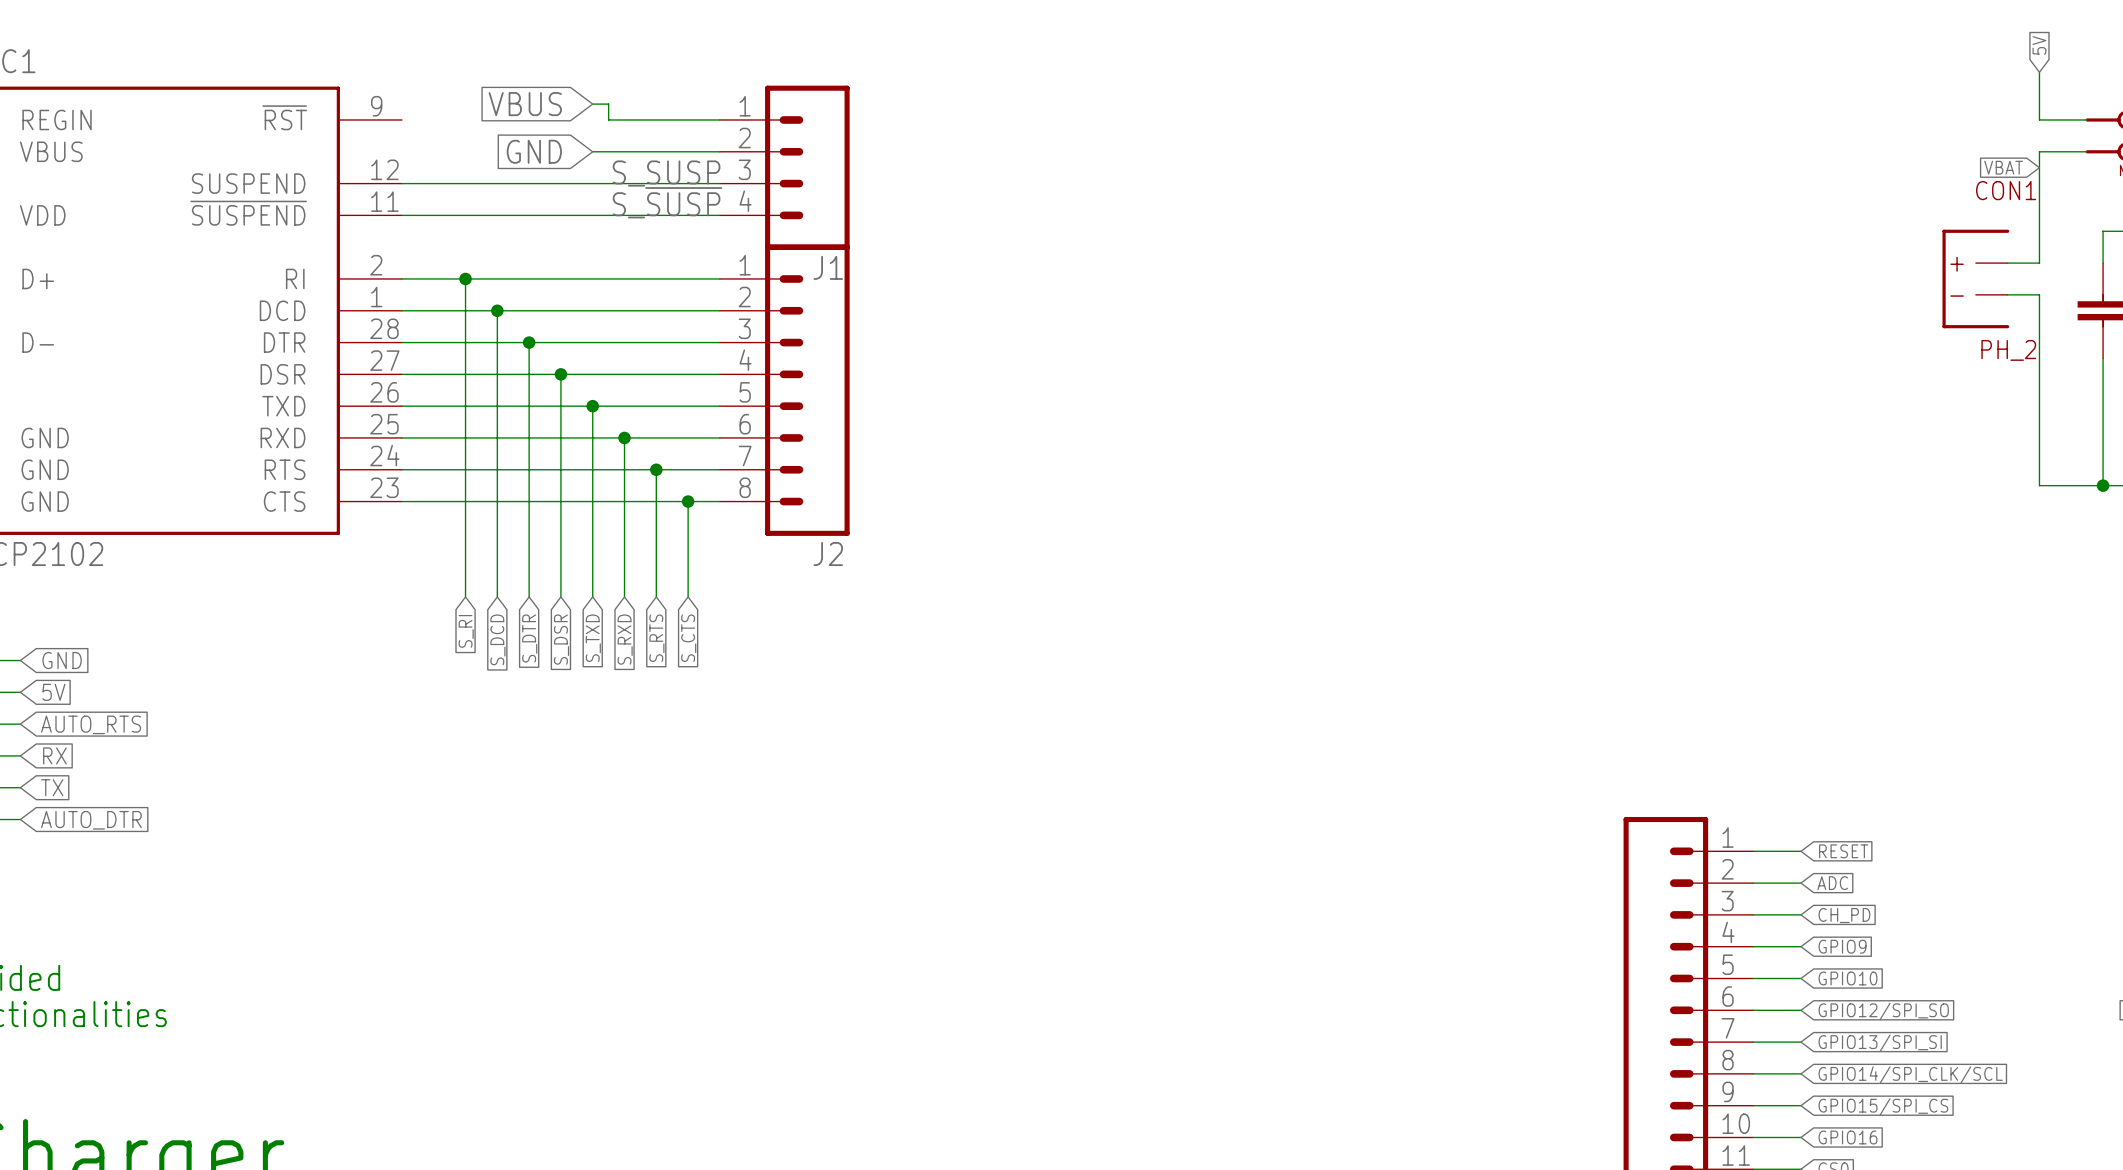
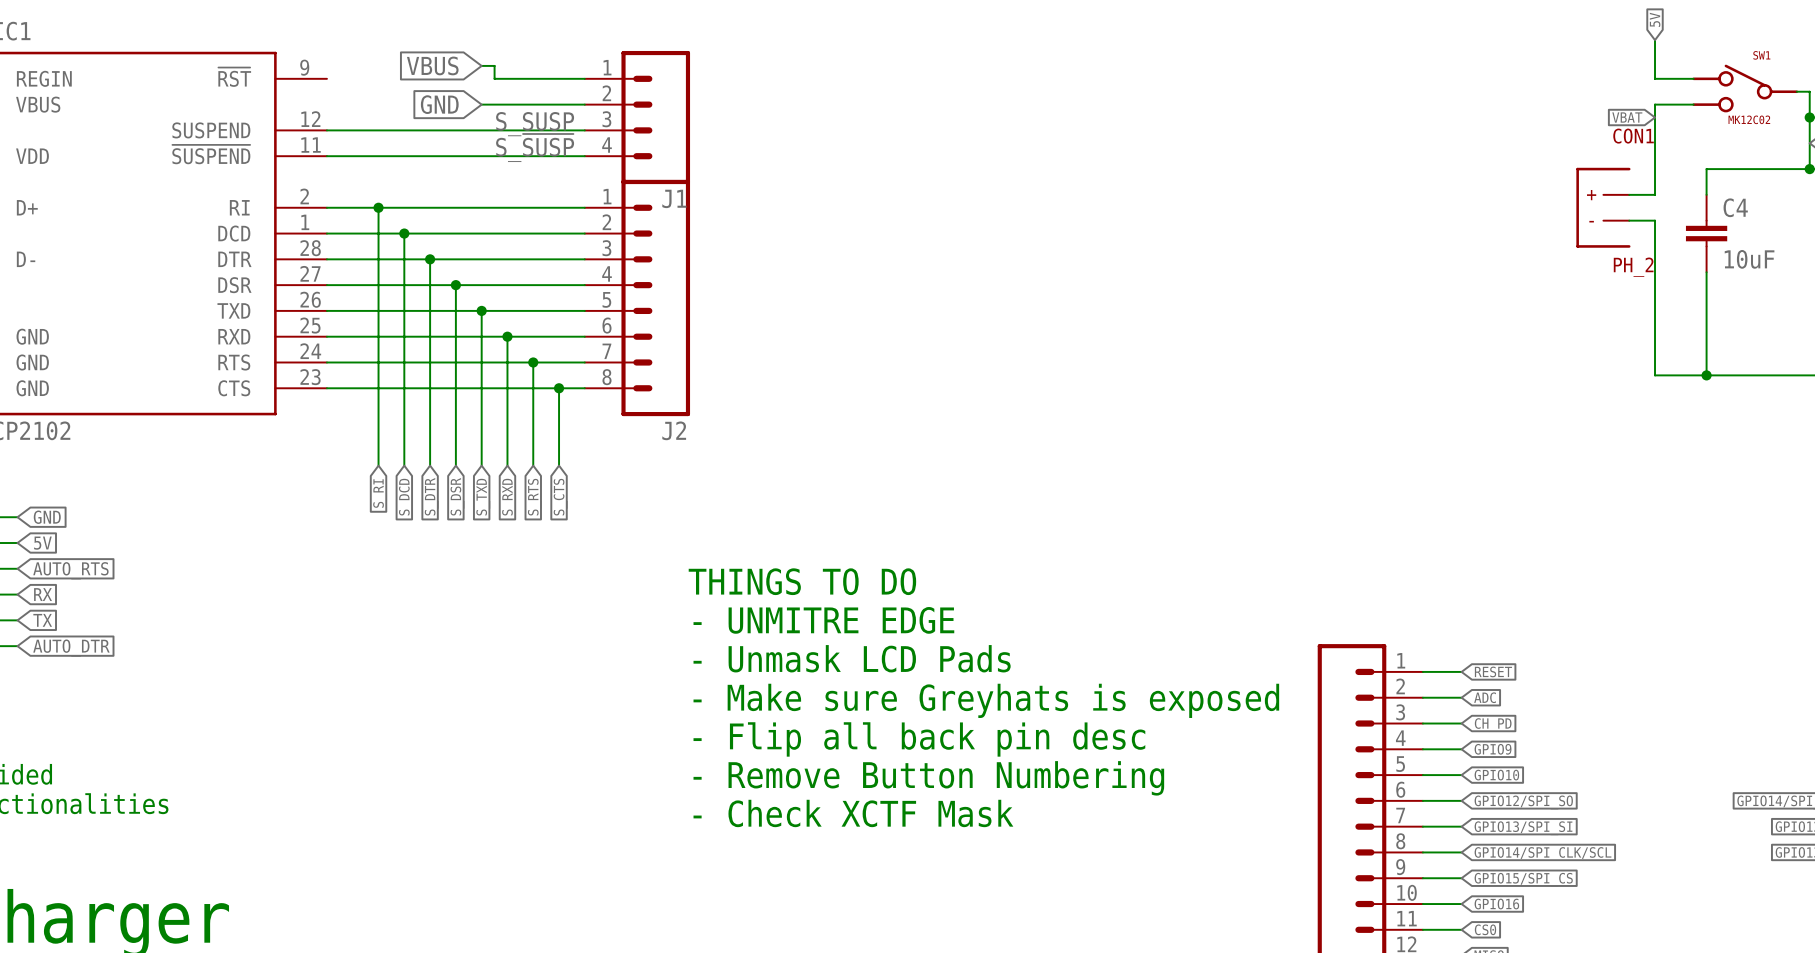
text: none -> THINGS TO DO (802, 581)
text: none -> - UNMITRE EDGE (823, 620)
text: none -> - Unmask LCD Pads (852, 658)
text: none -> - Make sure Greyhats is exposed (986, 700)
text: none -> - Flip all back pin desc (919, 739)
text: none -> - Remove Button Numbering (928, 778)
text: none -> - Check XCTF Mask (853, 813)

